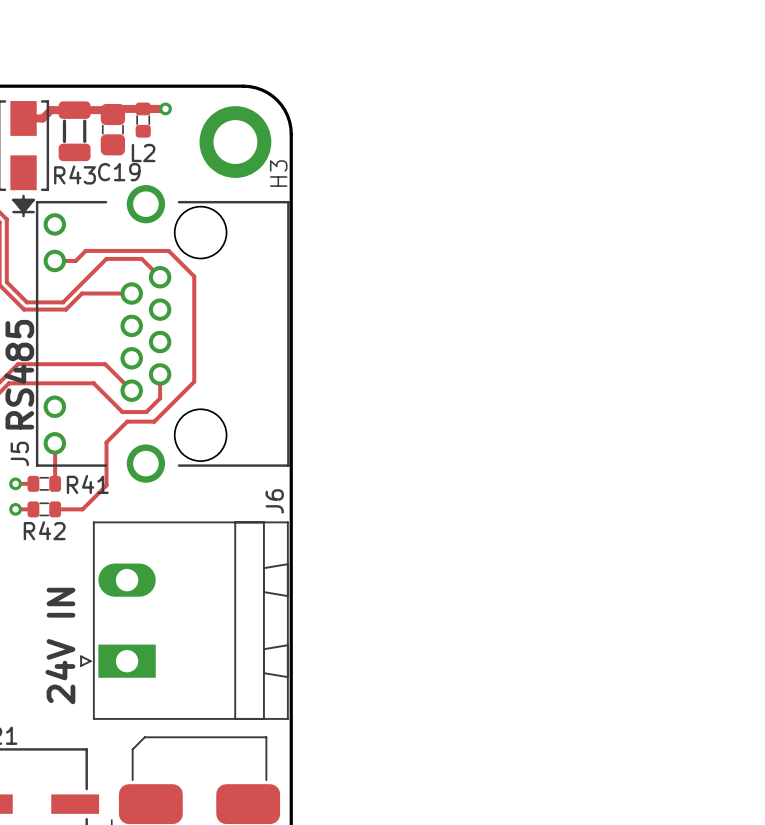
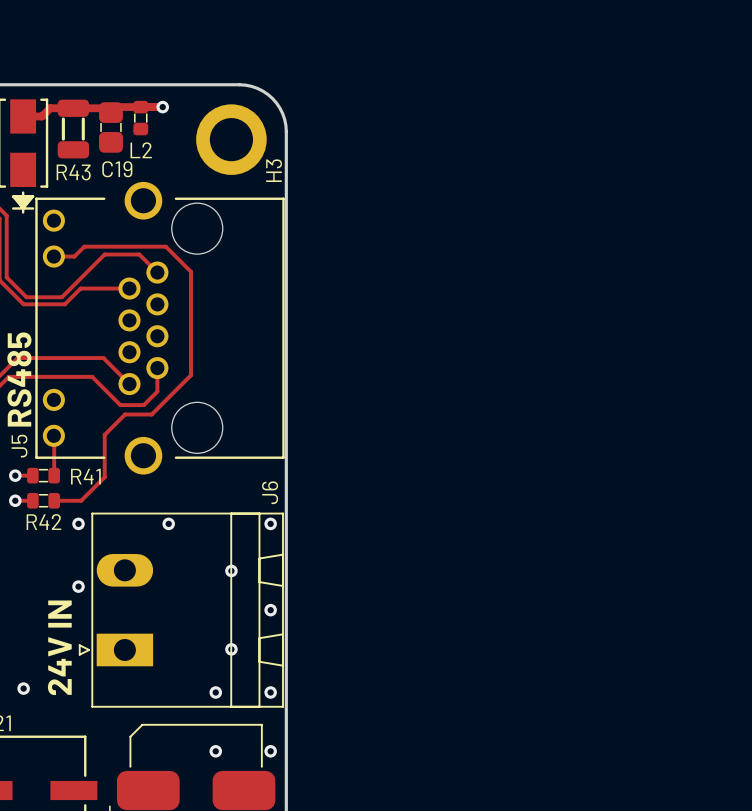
via: none -> (78, 523)
via: none -> (168, 523)
via: none -> (270, 523)
via: none -> (231, 570)
via: none -> (78, 586)
via: none -> (270, 610)
via: none -> (231, 649)
via: none -> (23, 688)
via: none -> (215, 692)
via: none -> (270, 692)
via: none -> (215, 751)
via: none -> (270, 751)

